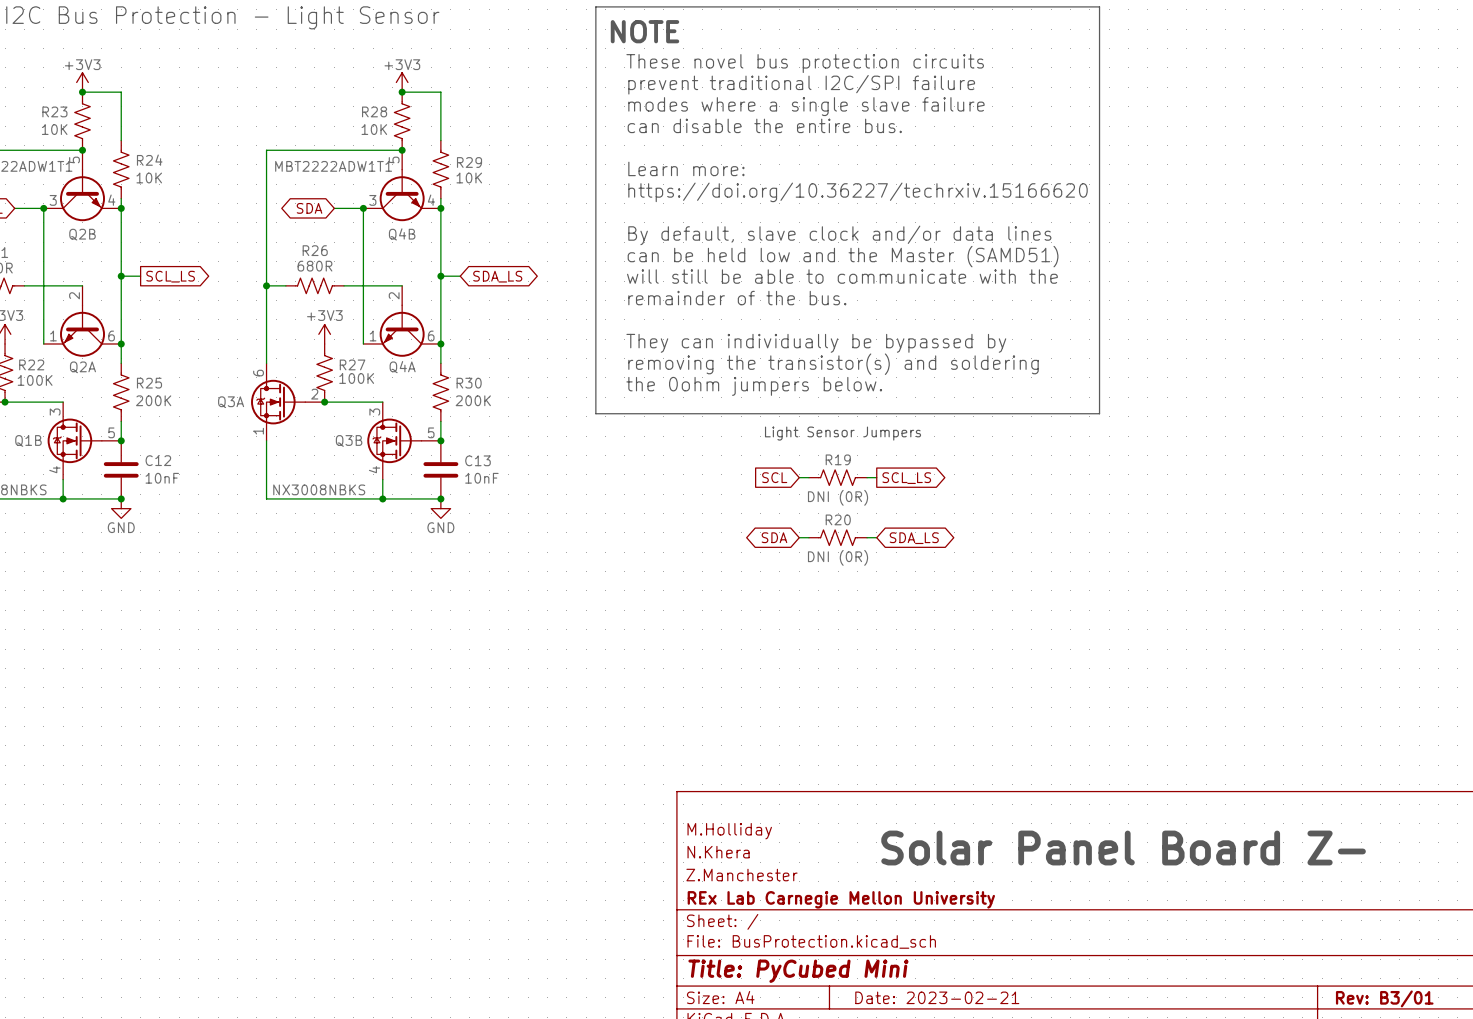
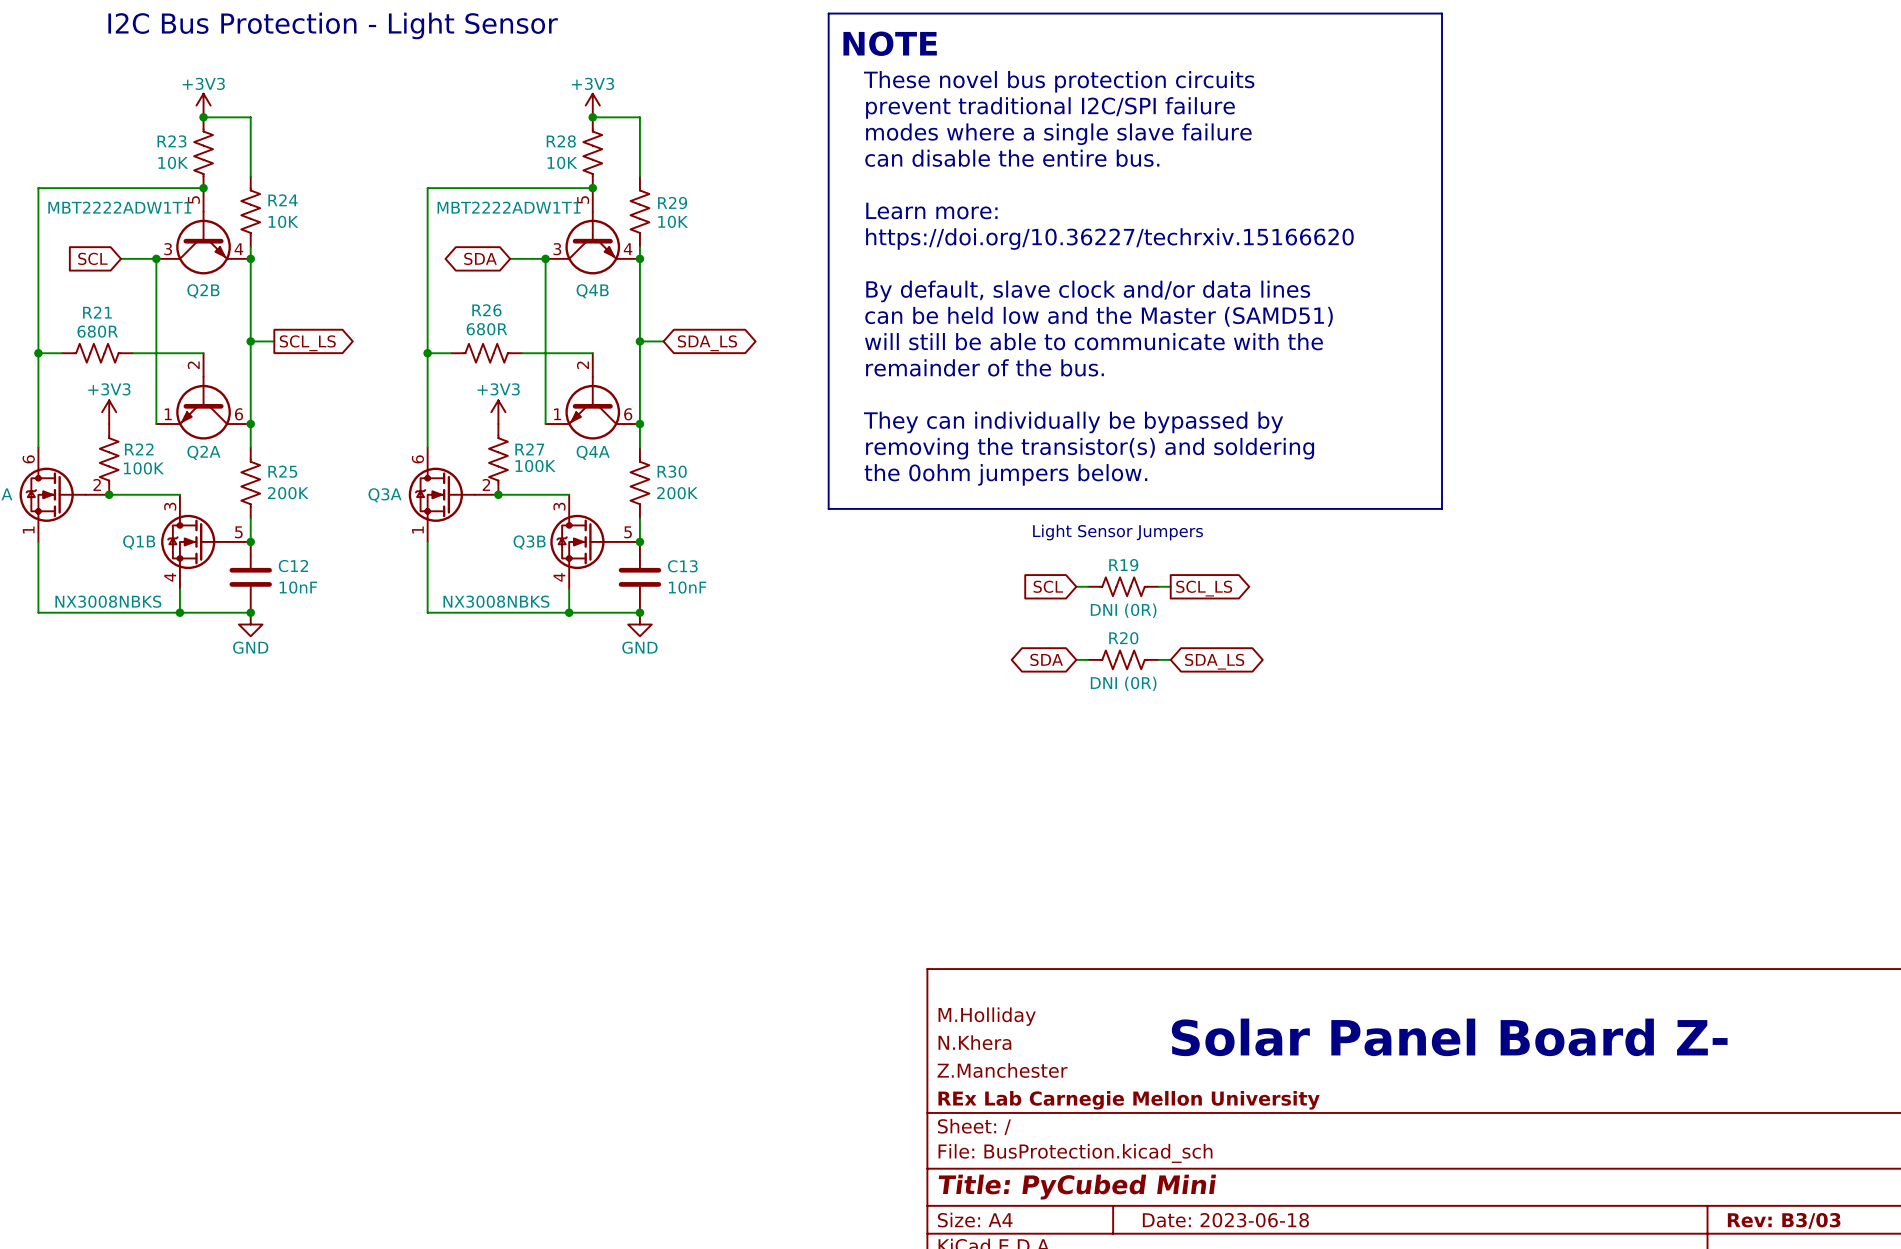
title block: Date: 2023-02-21 (937, 997) -> Date: 2023-06-18 (1225, 1220)
title block: Rev: B3/01 (1384, 998) -> Rev: B3/03 (1784, 1220)

